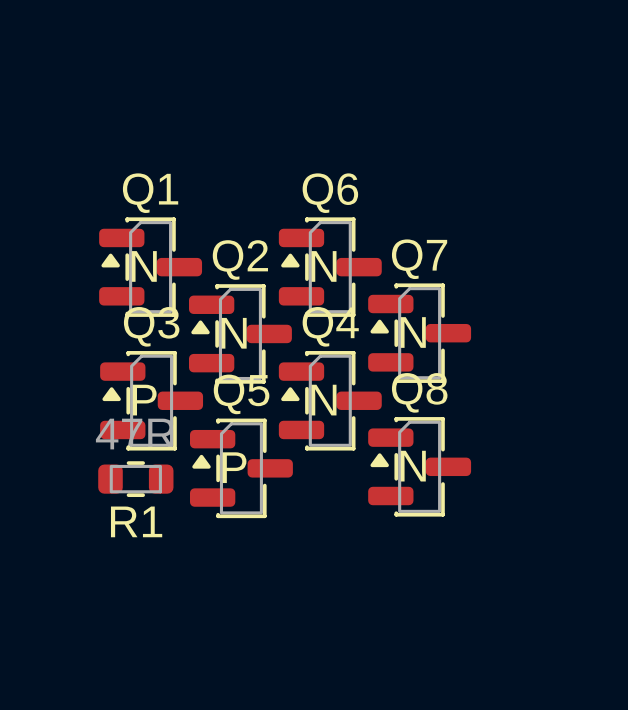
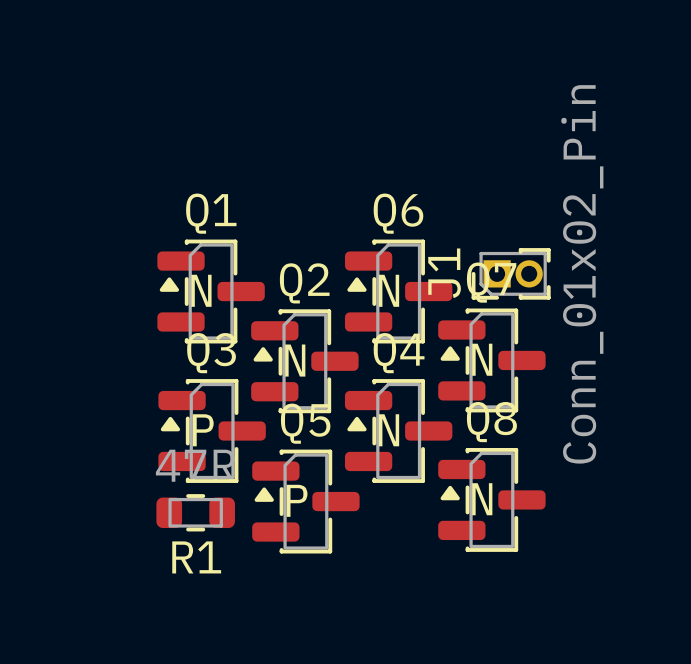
J1: none -> Conn_01x02_Pin (511, 273)

